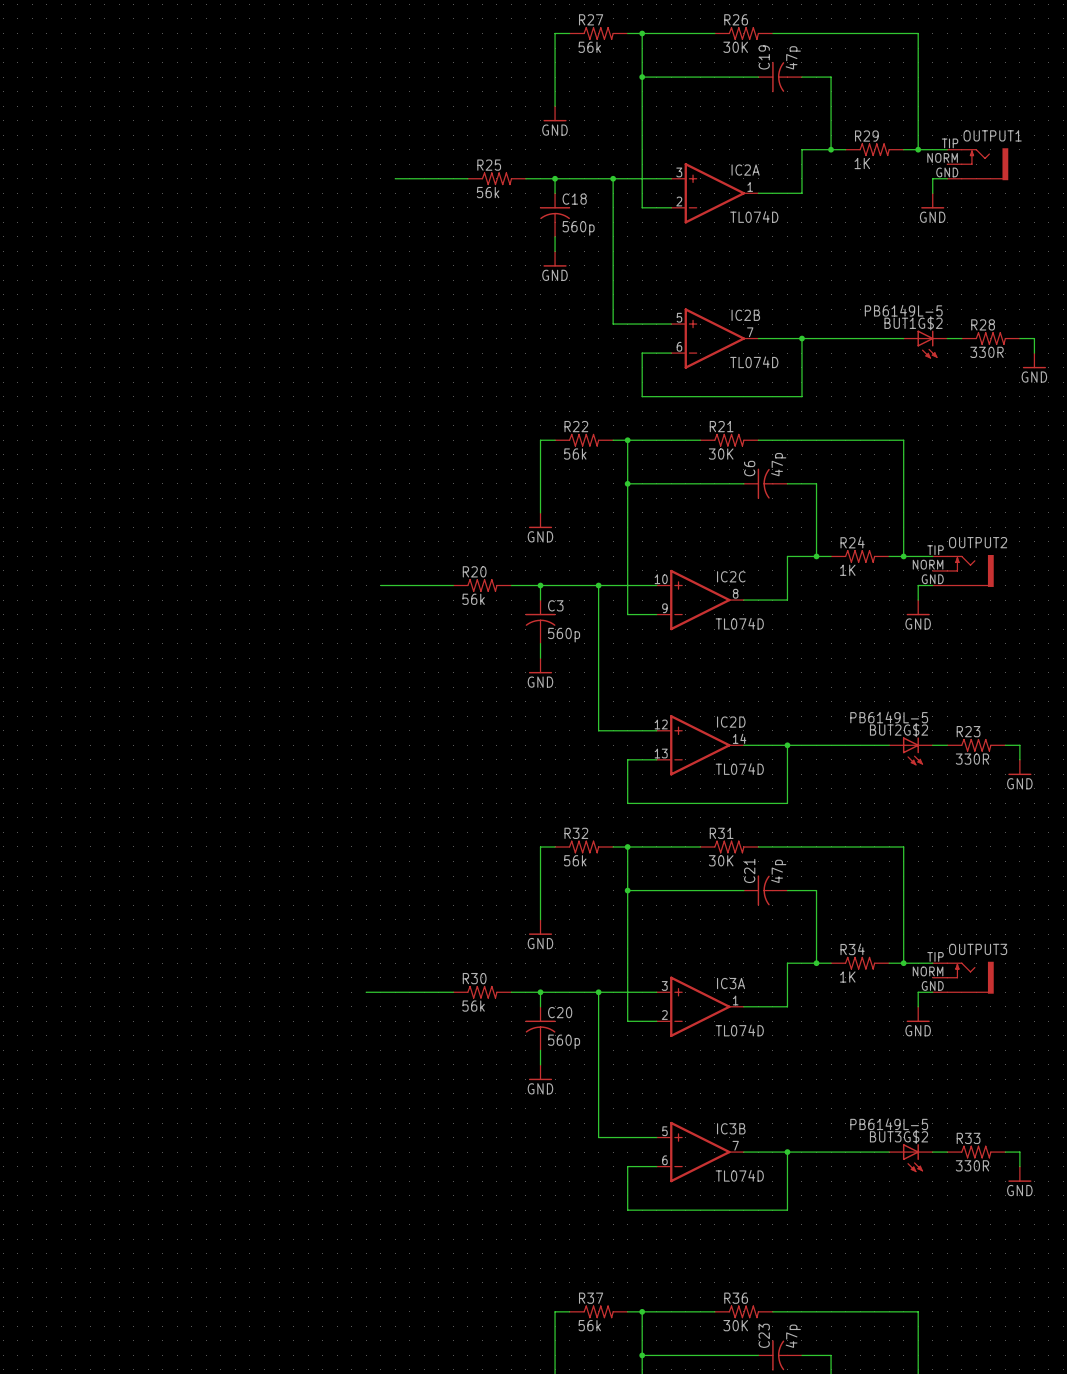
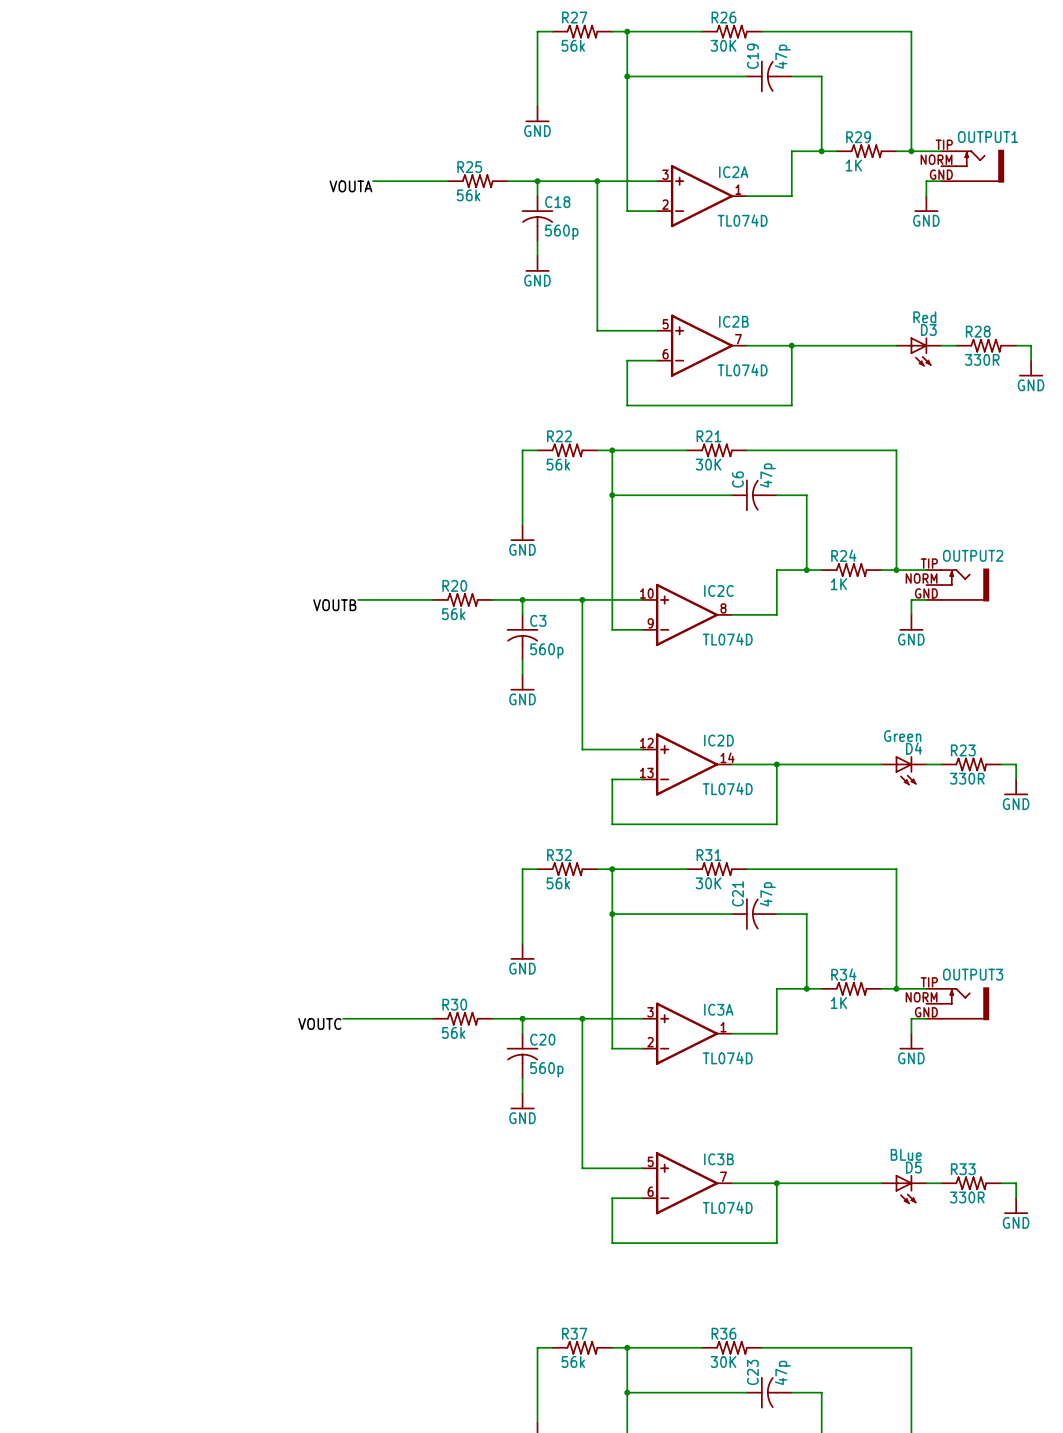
label: none -> VOUTA (350, 186)
BUT1G$2 value: PB6149L-5 (903, 310) -> Red (924, 317)
BUT1G$2 name: BUT1G$2 (913, 323) -> D3 (928, 329)
label: none -> VOUTB (334, 605)
BUT2G$2 value: PB6149L-5 (889, 717) -> Green (902, 736)
BUT2G$2 name: BUT2G$2 (899, 730) -> D4 (914, 748)
label: none -> VOUTC (319, 1023)
BUT3G$2 value: PB6149L-5 (889, 1124) -> BLue (906, 1154)
BUT3G$2 name: BUT3G$2 (899, 1136) -> D5 (913, 1167)

